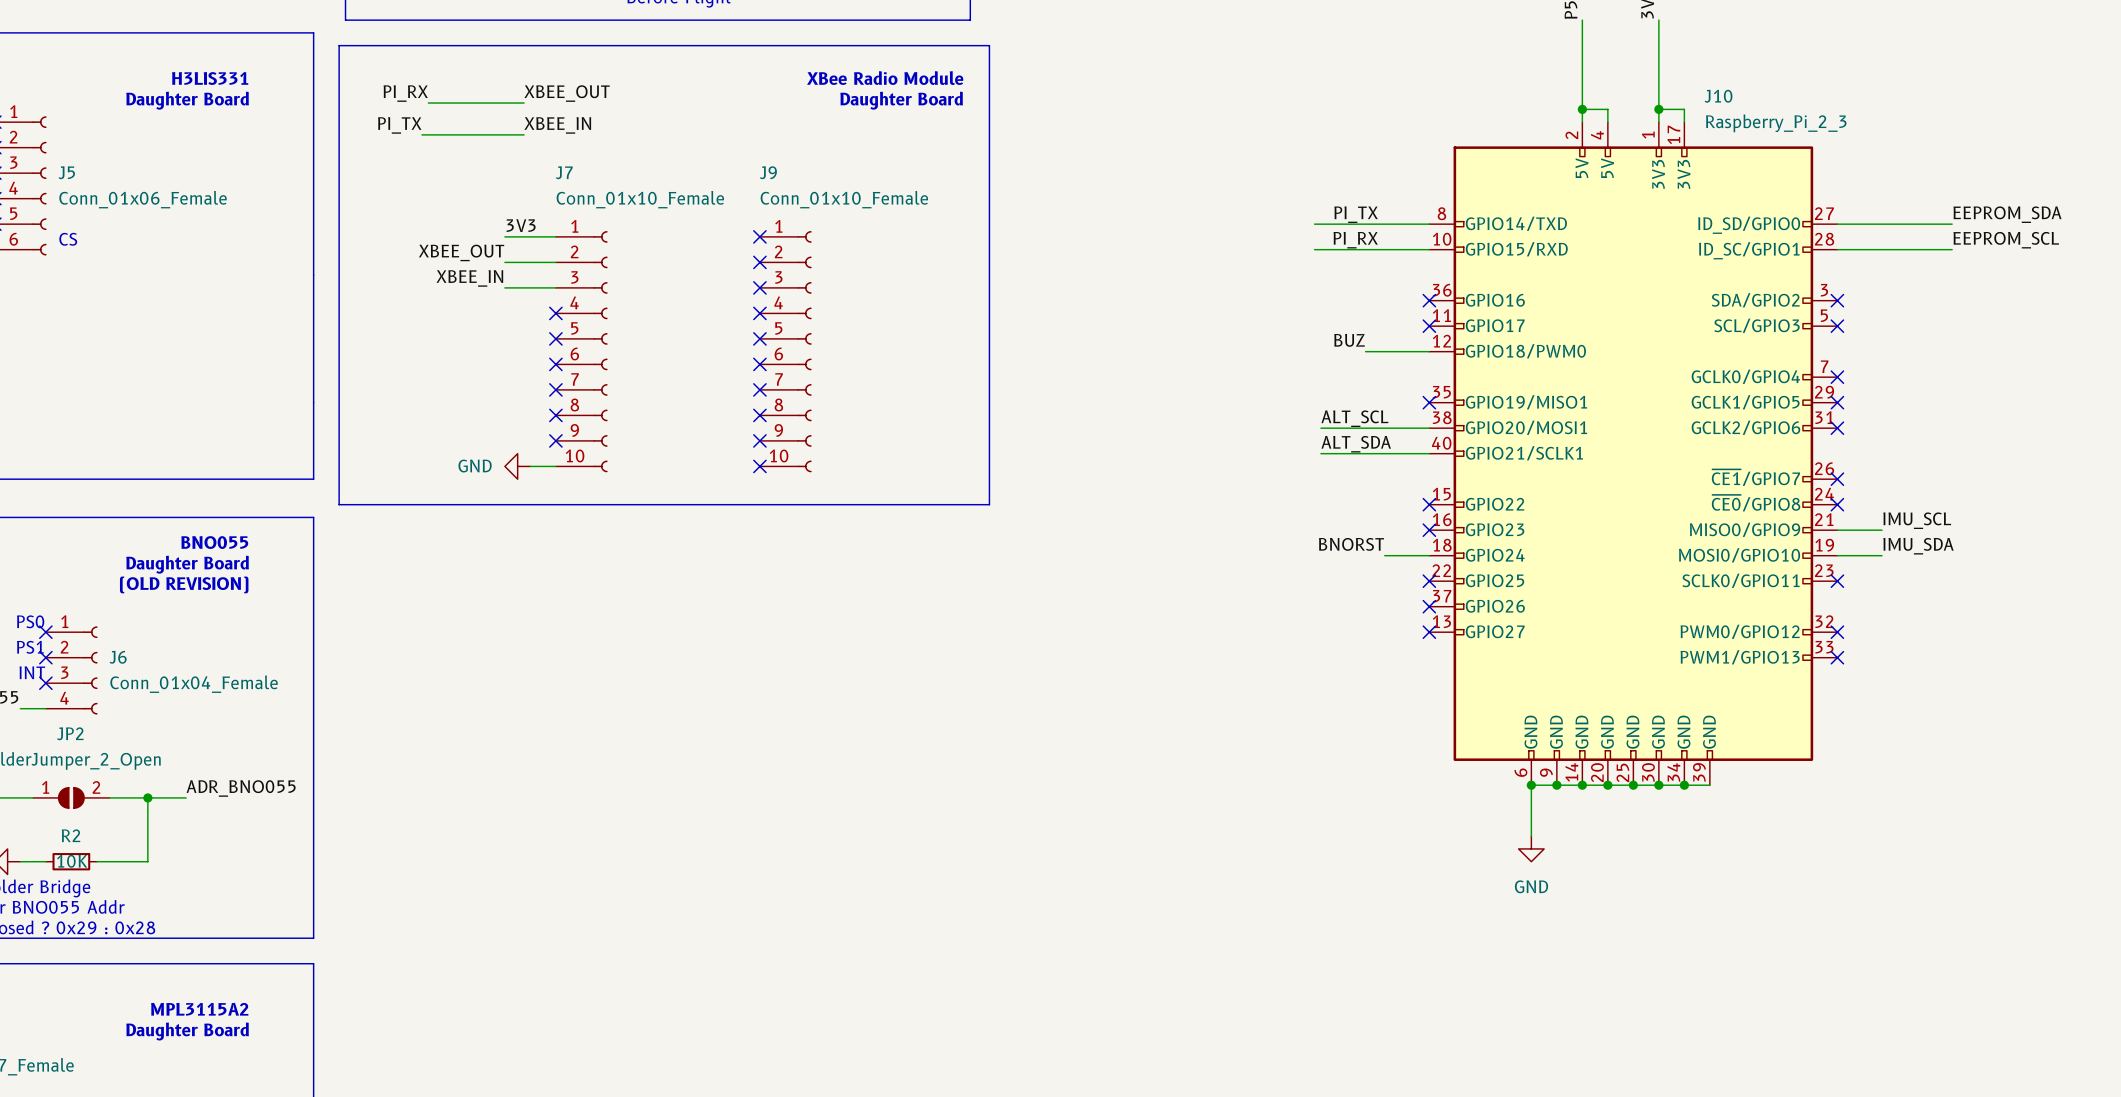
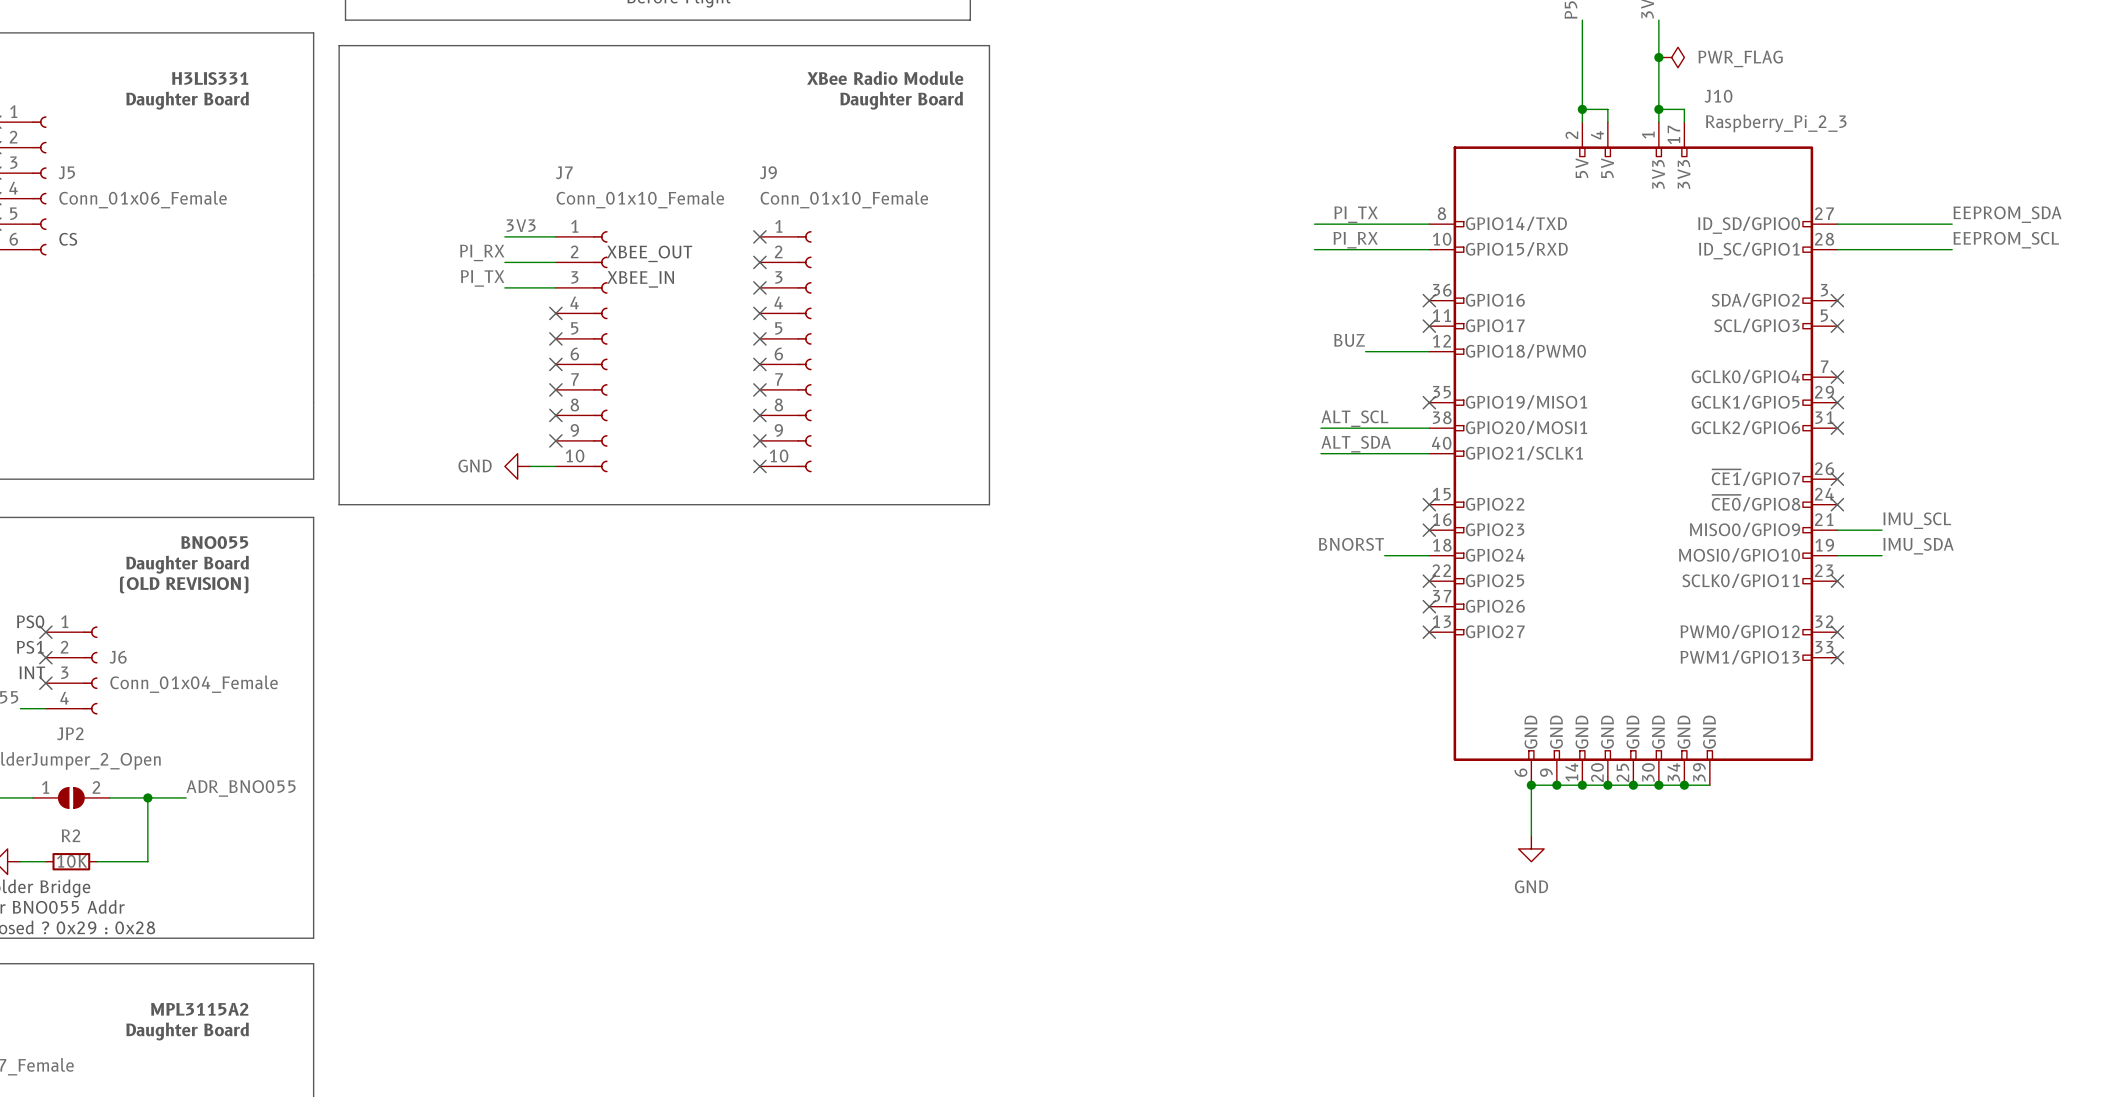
junction: none -> (1658, 57)
power symbol: none -> PWR_FLAG (1671, 57)
label: PI_RX (405, 93) -> none
label: XBEE_OUT (567, 93) -> none
wire: (428, 103) (524, 103) -> none
label: PI_TX (399, 125) -> none
label: XBEE_IN (557, 125) -> none
wire: (422, 134) (524, 134) -> none
label: XBEE_OUT (461, 252) -> PI_RX (482, 252)
text: none -> XBEE_OUT (649, 253)
label: XBEE_IN (469, 278) -> PI_TX (482, 278)
text: none -> XBEE_IN (640, 279)

